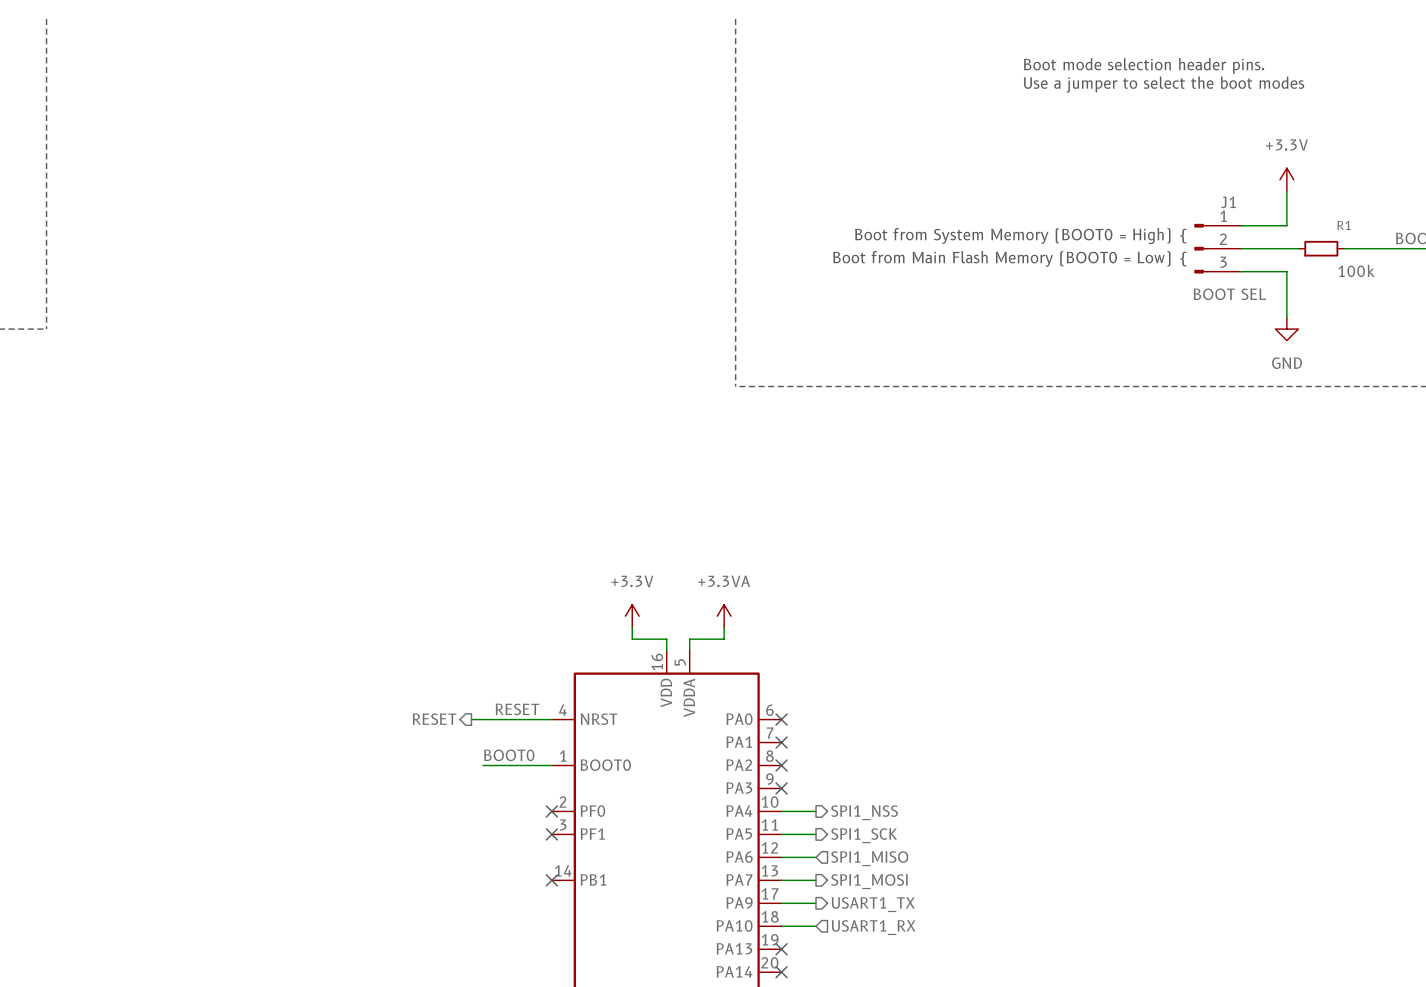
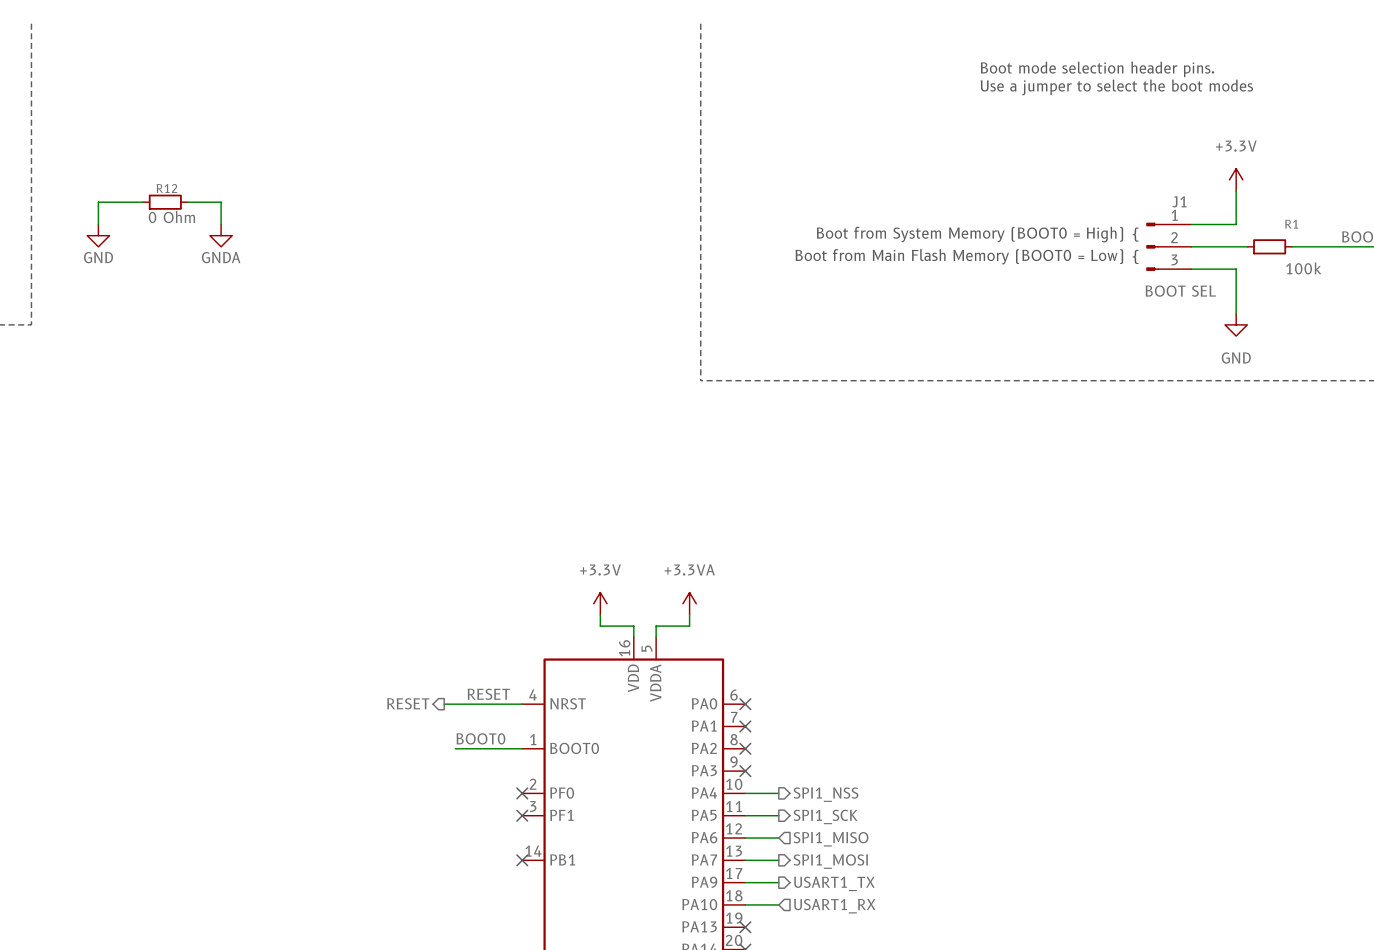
wire: none -> (143, 202) (98, 202) (98, 224)
R12: none -> 0 Ohm (165, 202)
wire: none -> (187, 202) (221, 202) (221, 224)
power symbol: none -> GND (98, 235)
power symbol: none -> GNDA (221, 235)

